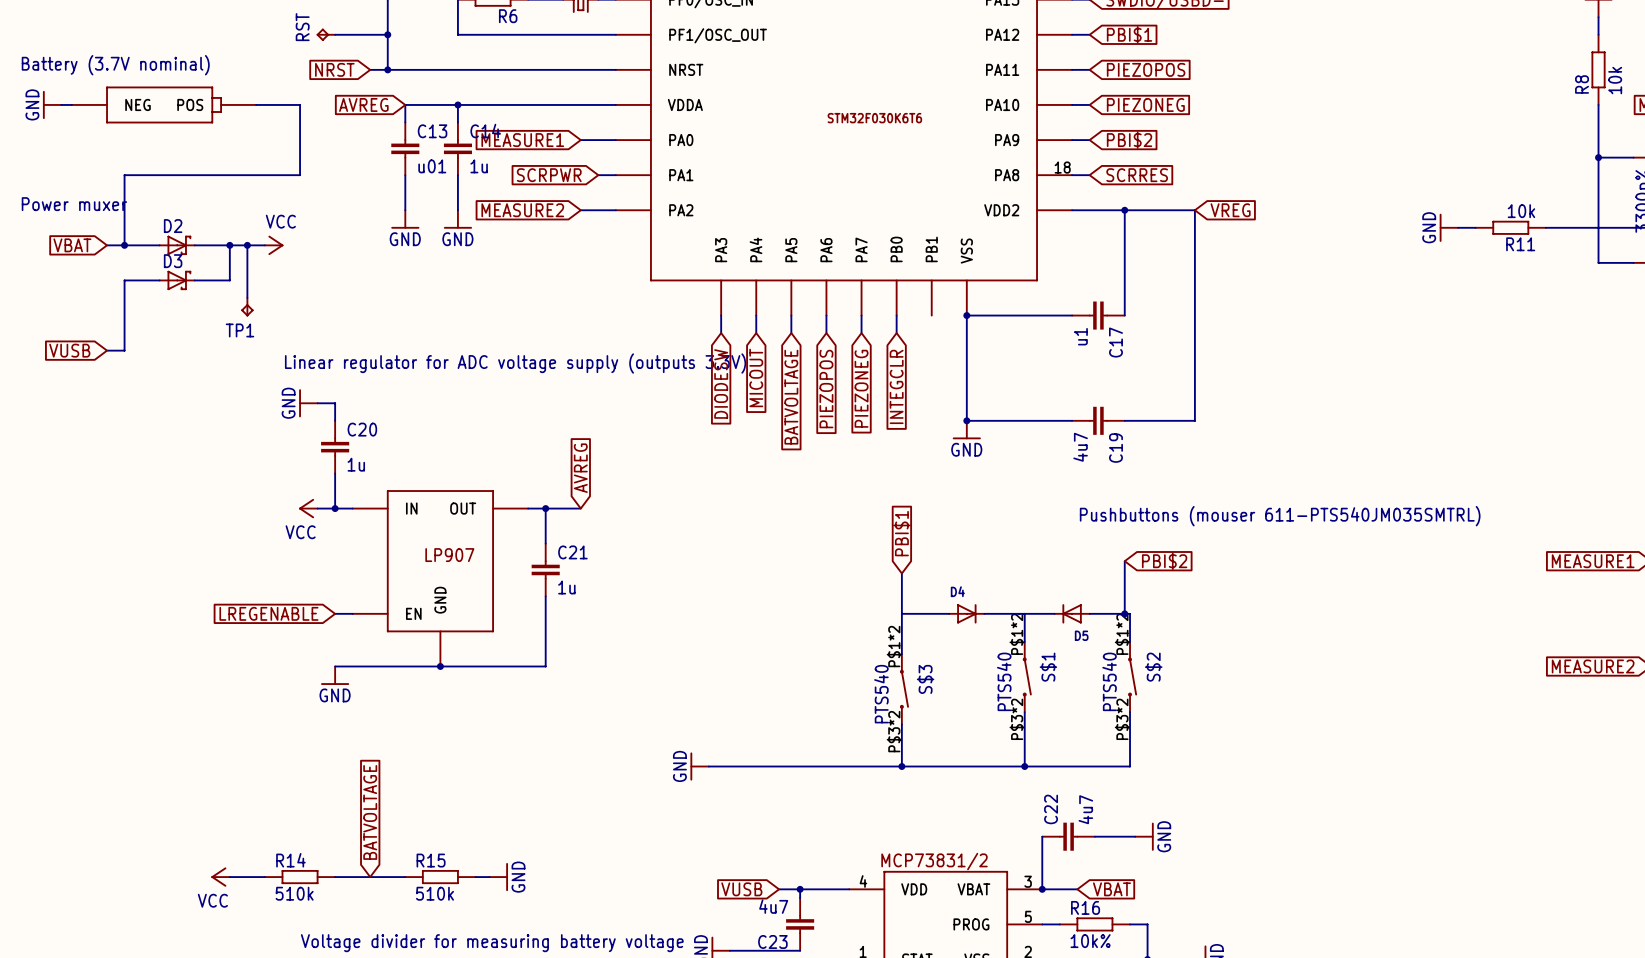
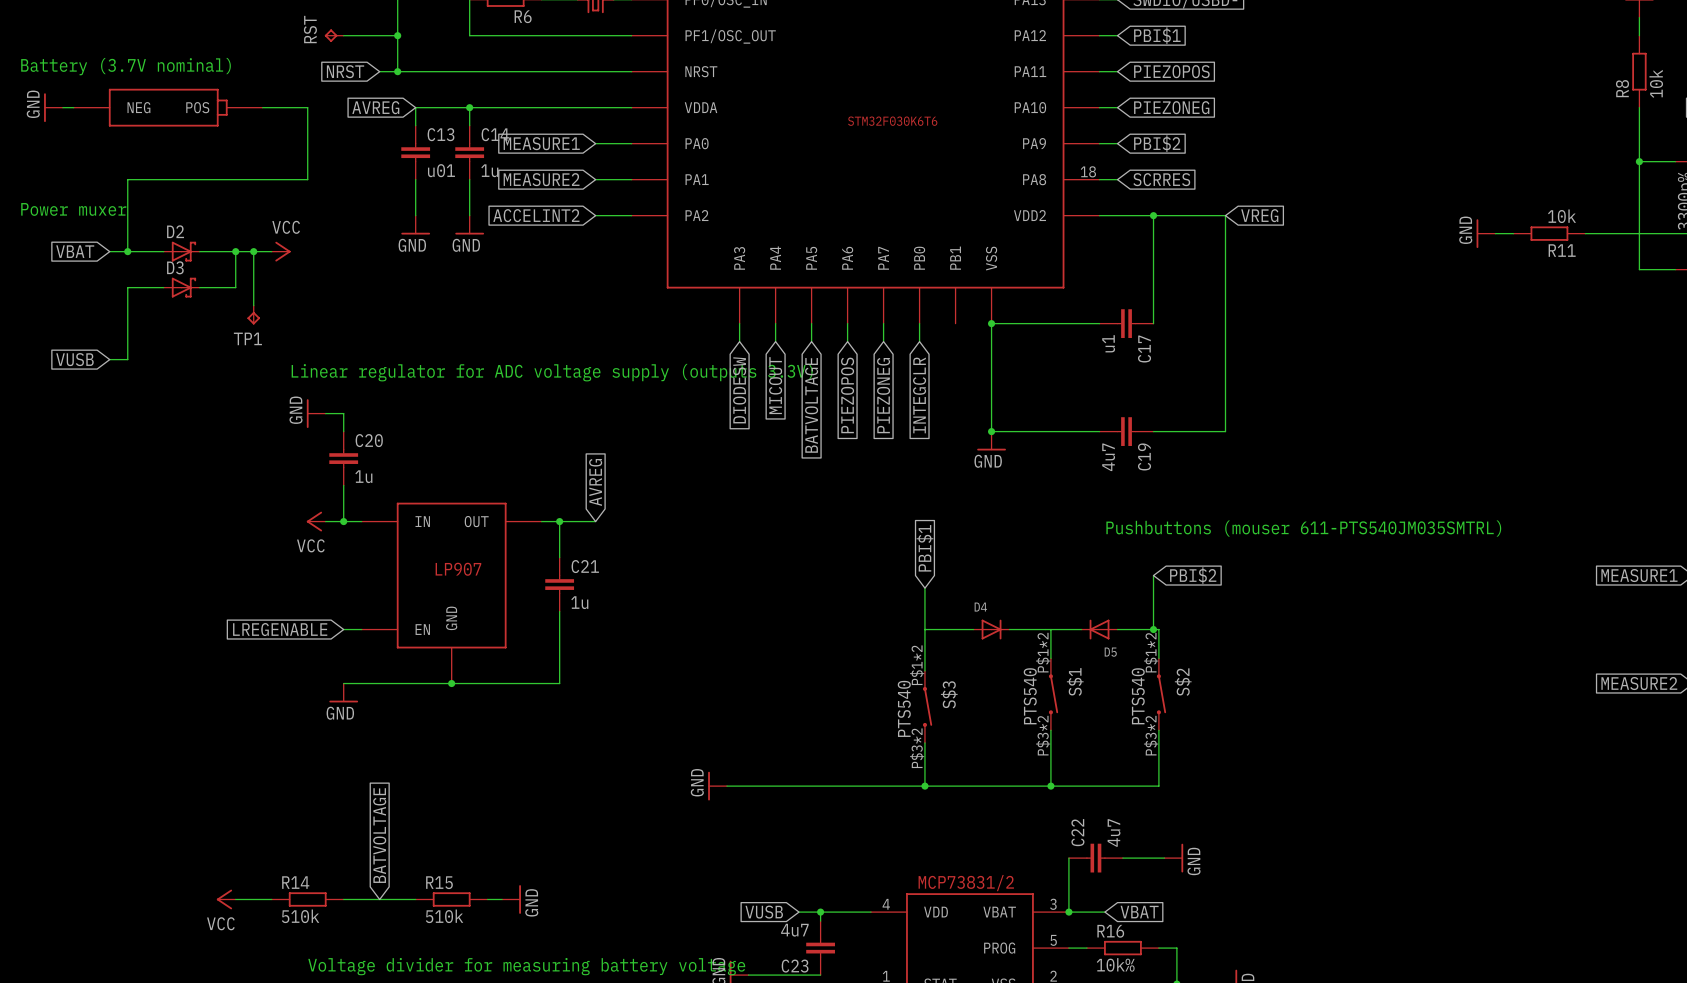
global label: none -> MEASURE2 (541, 179)
global label: SCRPWR (549, 175) -> none
wire: none -> (595, 179) (613, 179)
global label: MEASURE2 (522, 210) -> ACCELINT2 (536, 215)

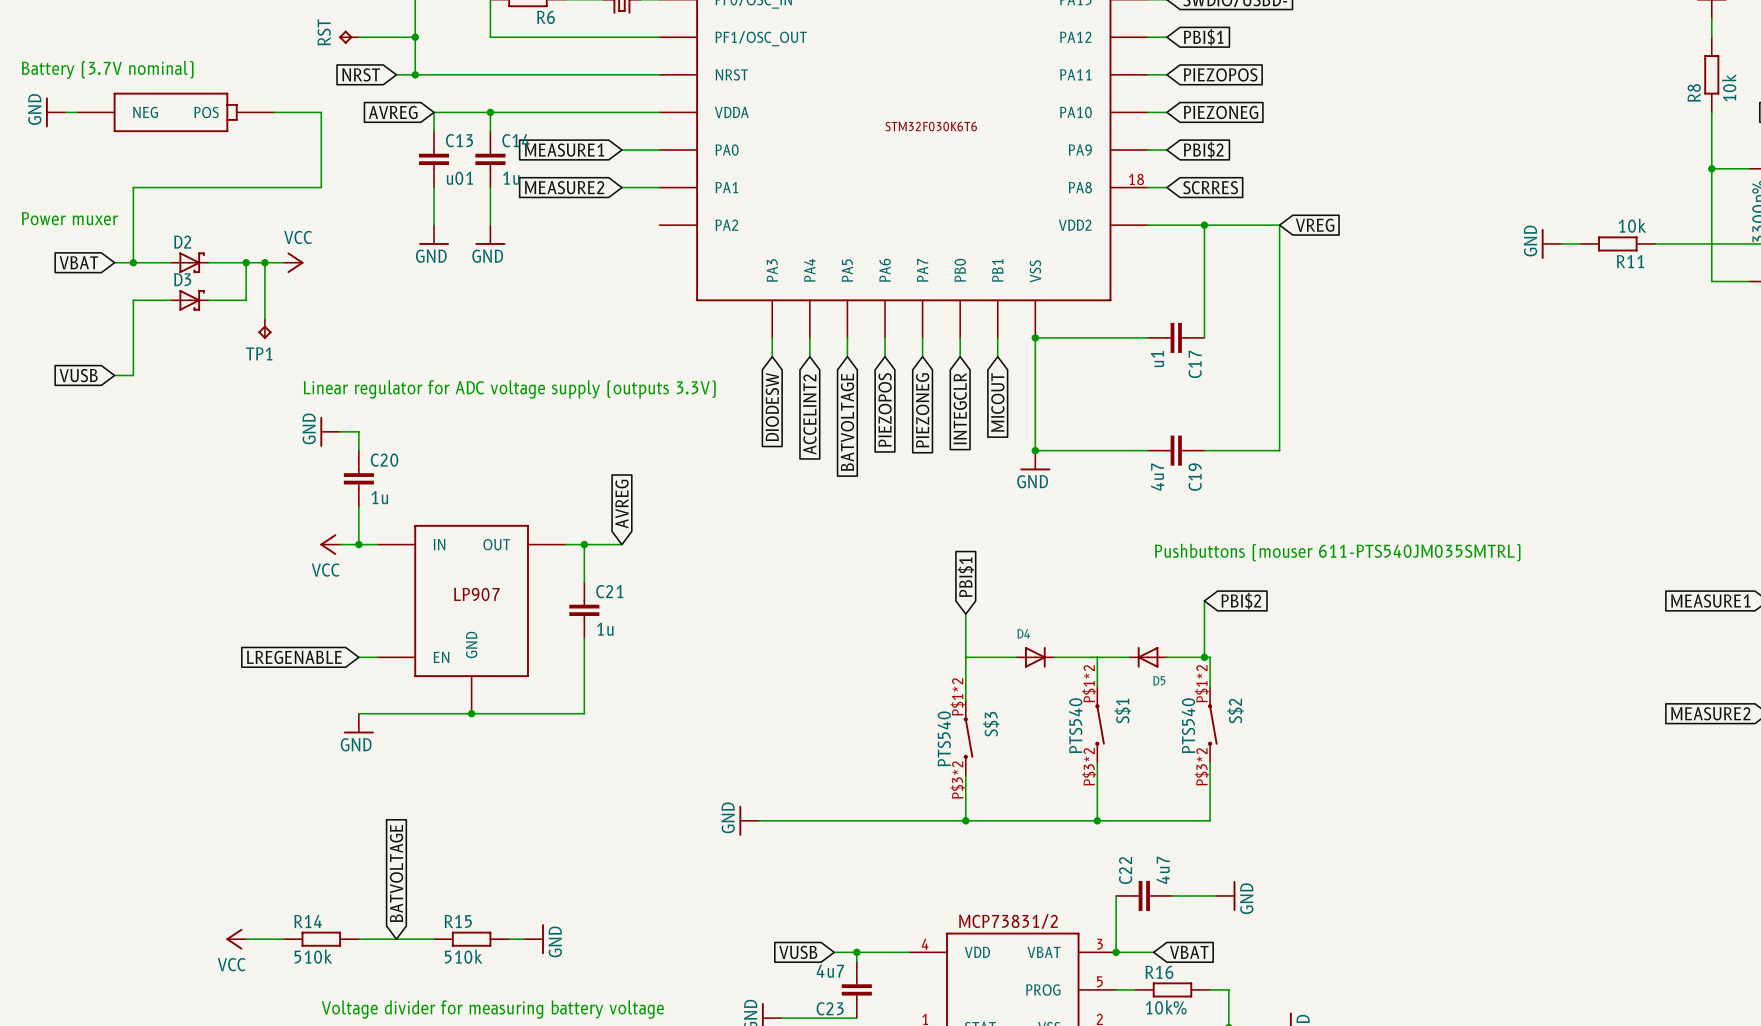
global label: ACCELINT2 (536, 215) -> none
wire: (595, 215) (631, 215) -> none
wire: none -> (997, 337) (997, 356)
global label: MICOUT (775, 385) -> ACCELINT2 (809, 414)
global label: none -> MICOUT (997, 402)

